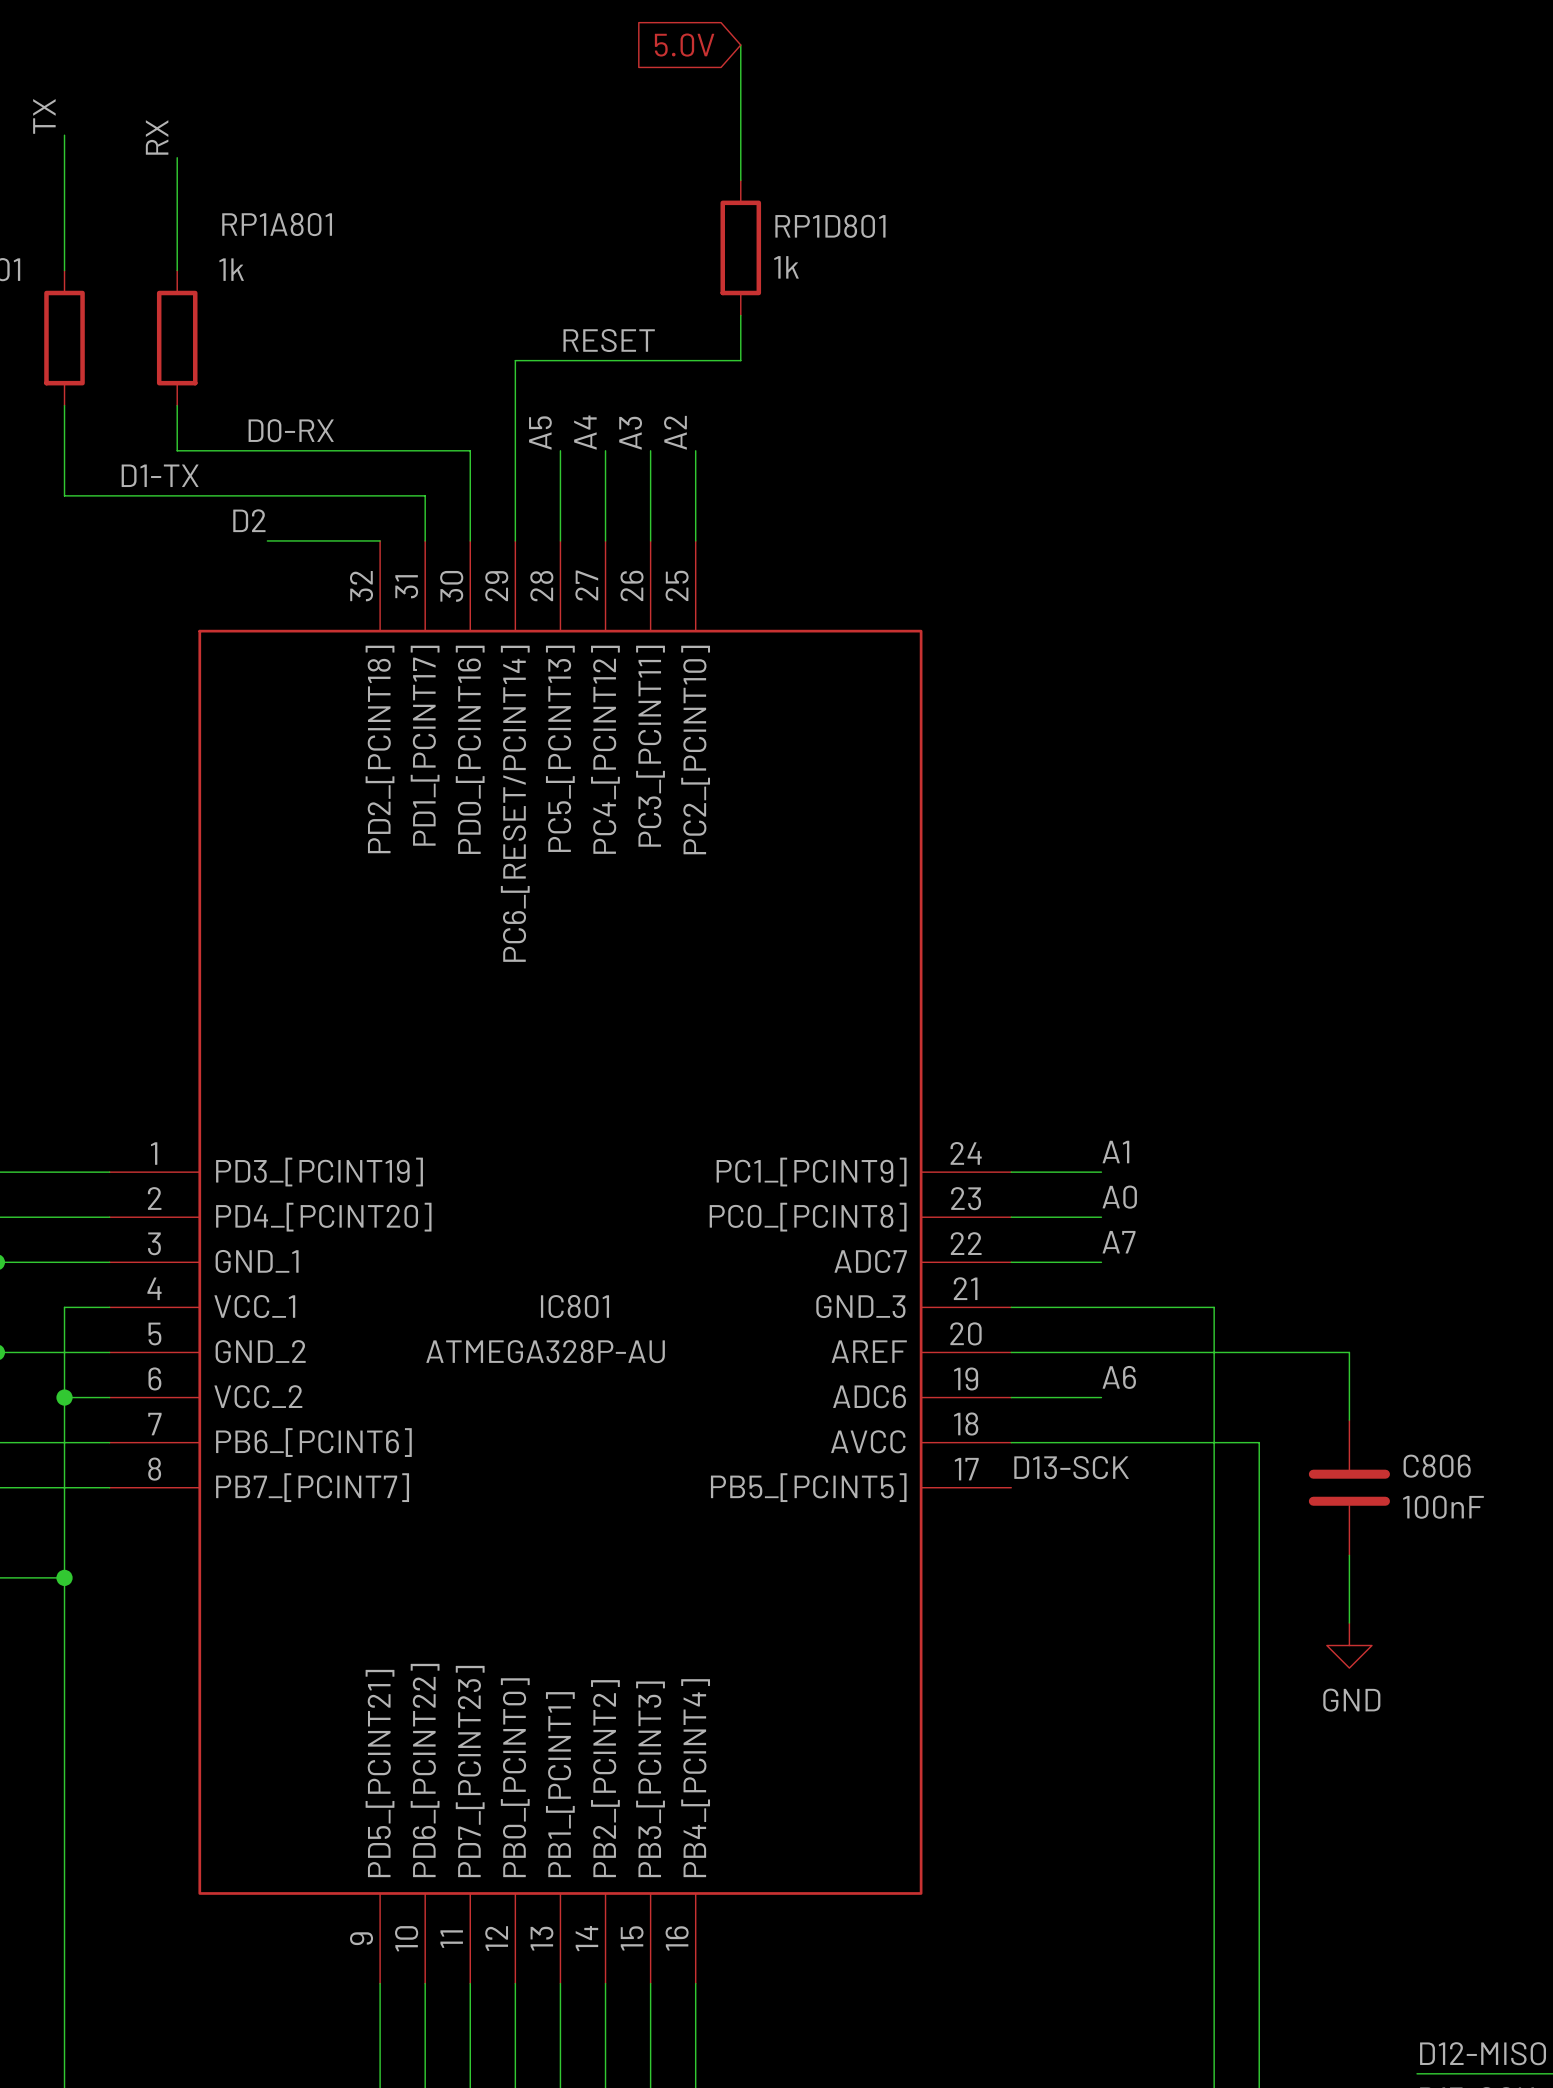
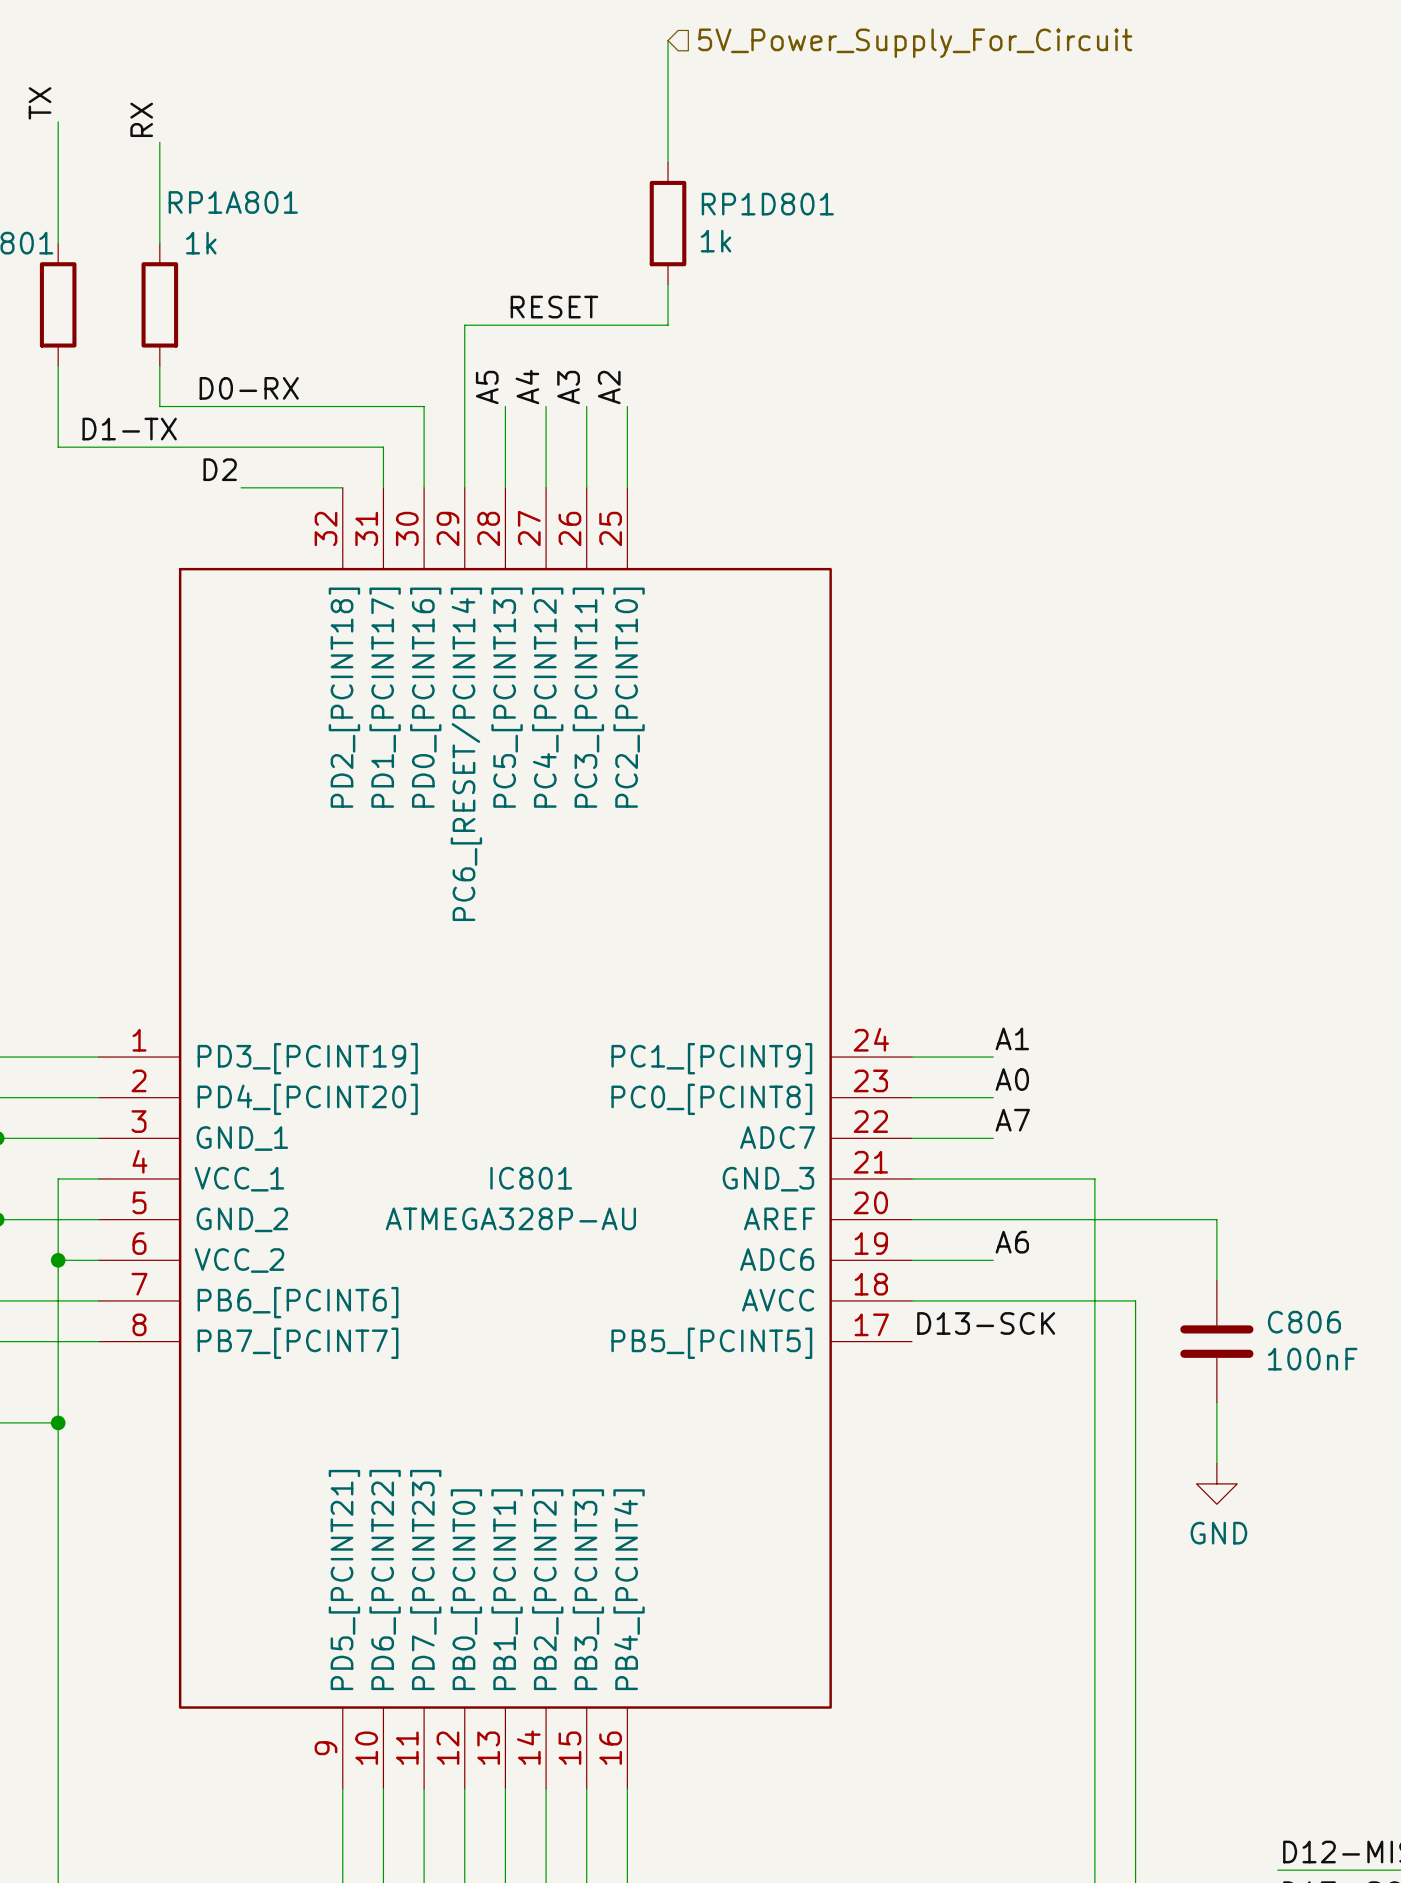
global label: 5.0V (684, 45) -> none
hierarchical label: none -> 5V_Power_Supply_For_Circuit (915, 43)

